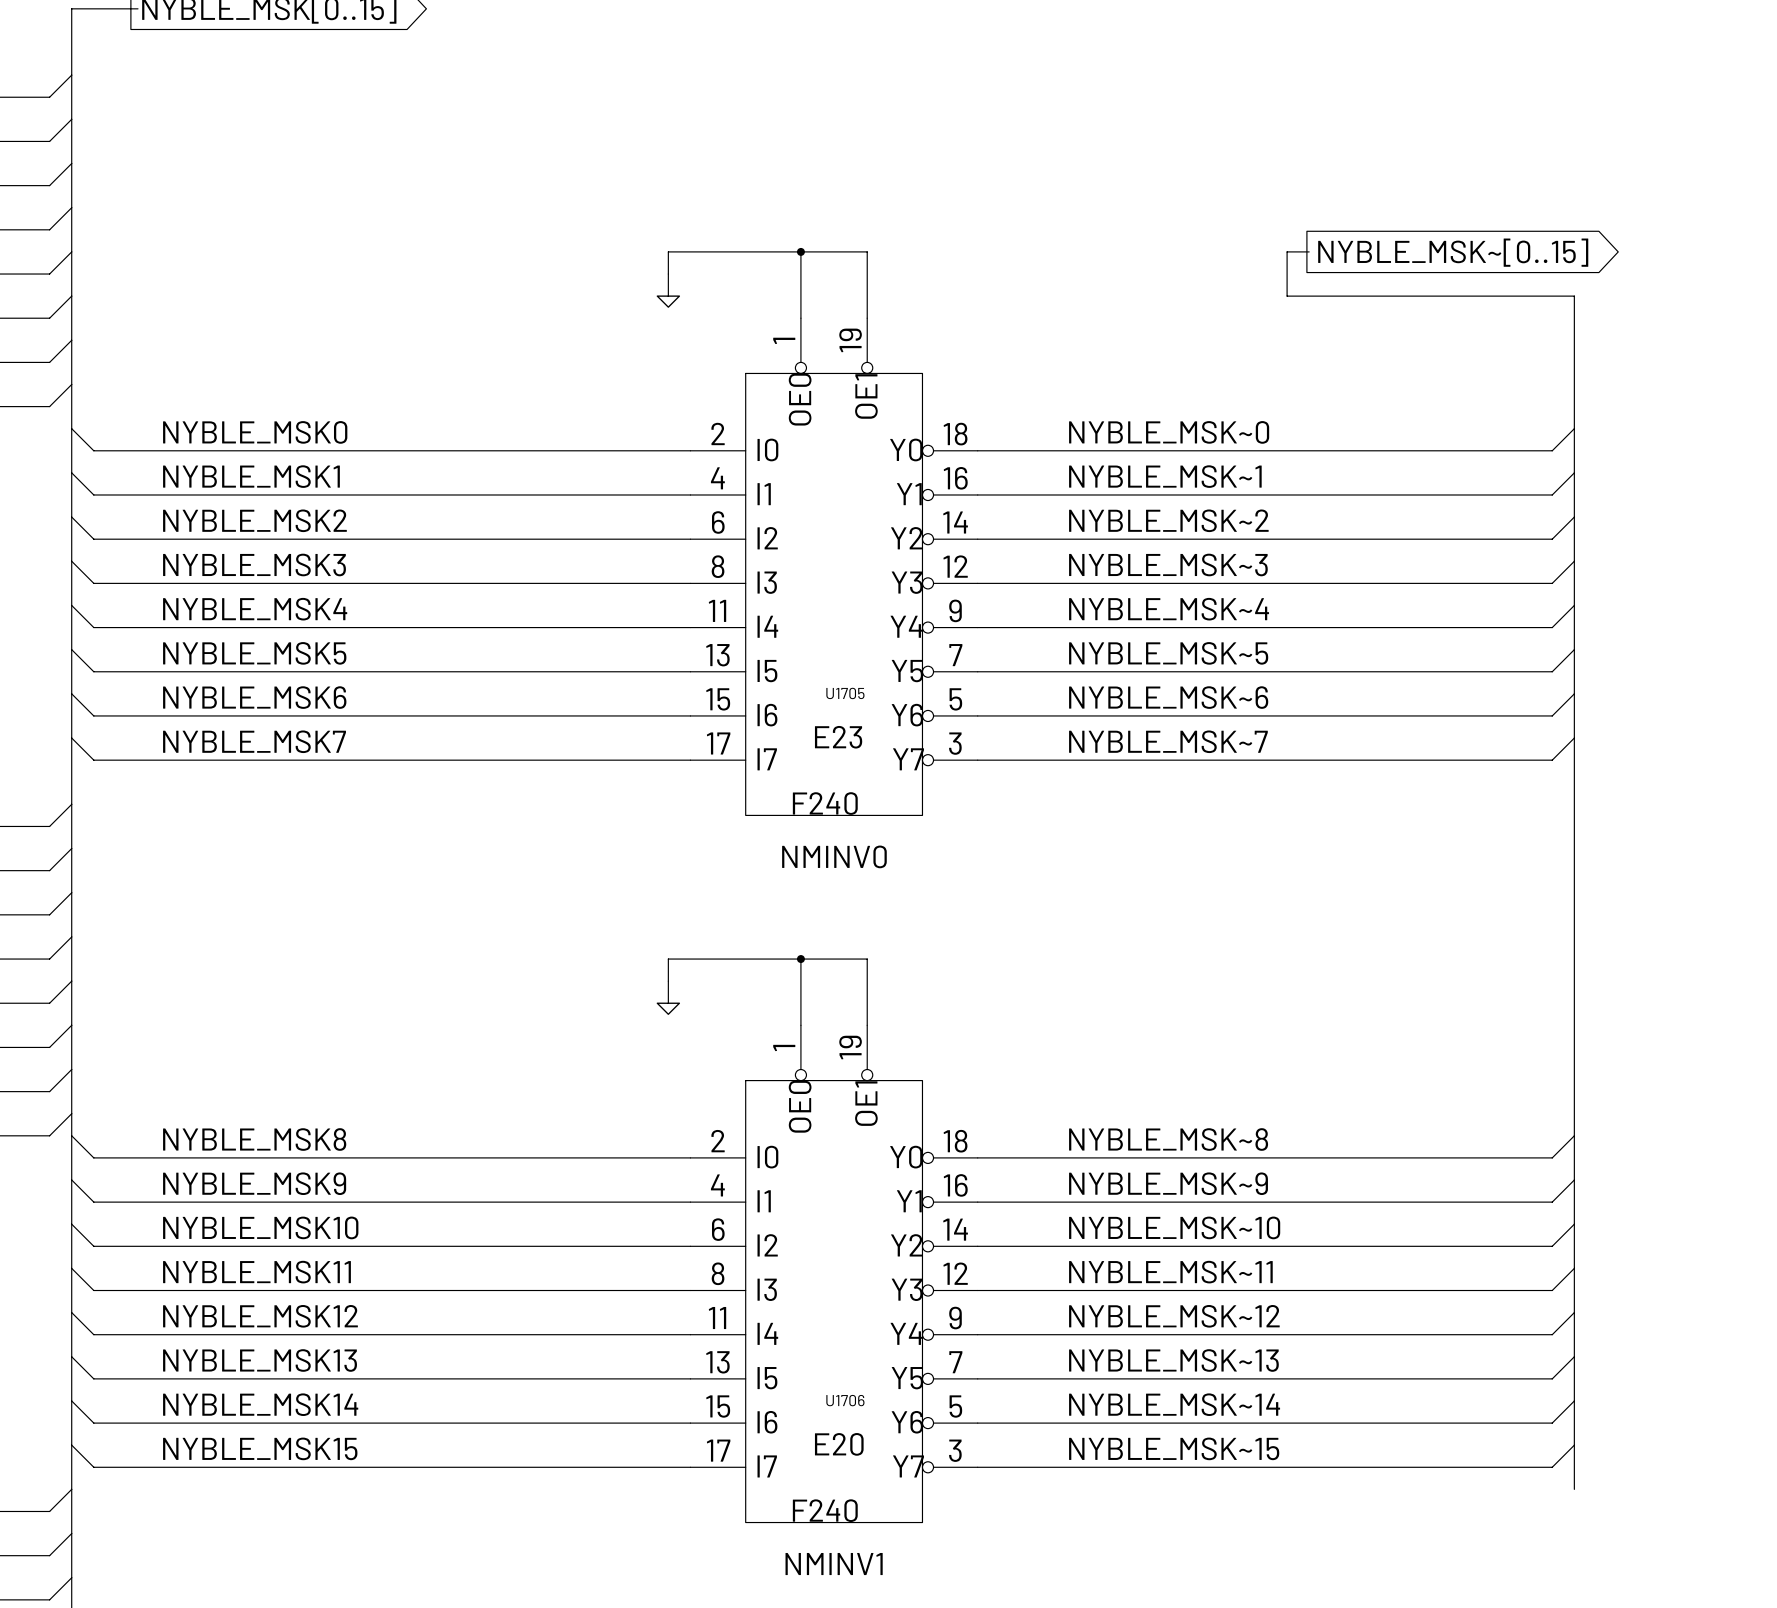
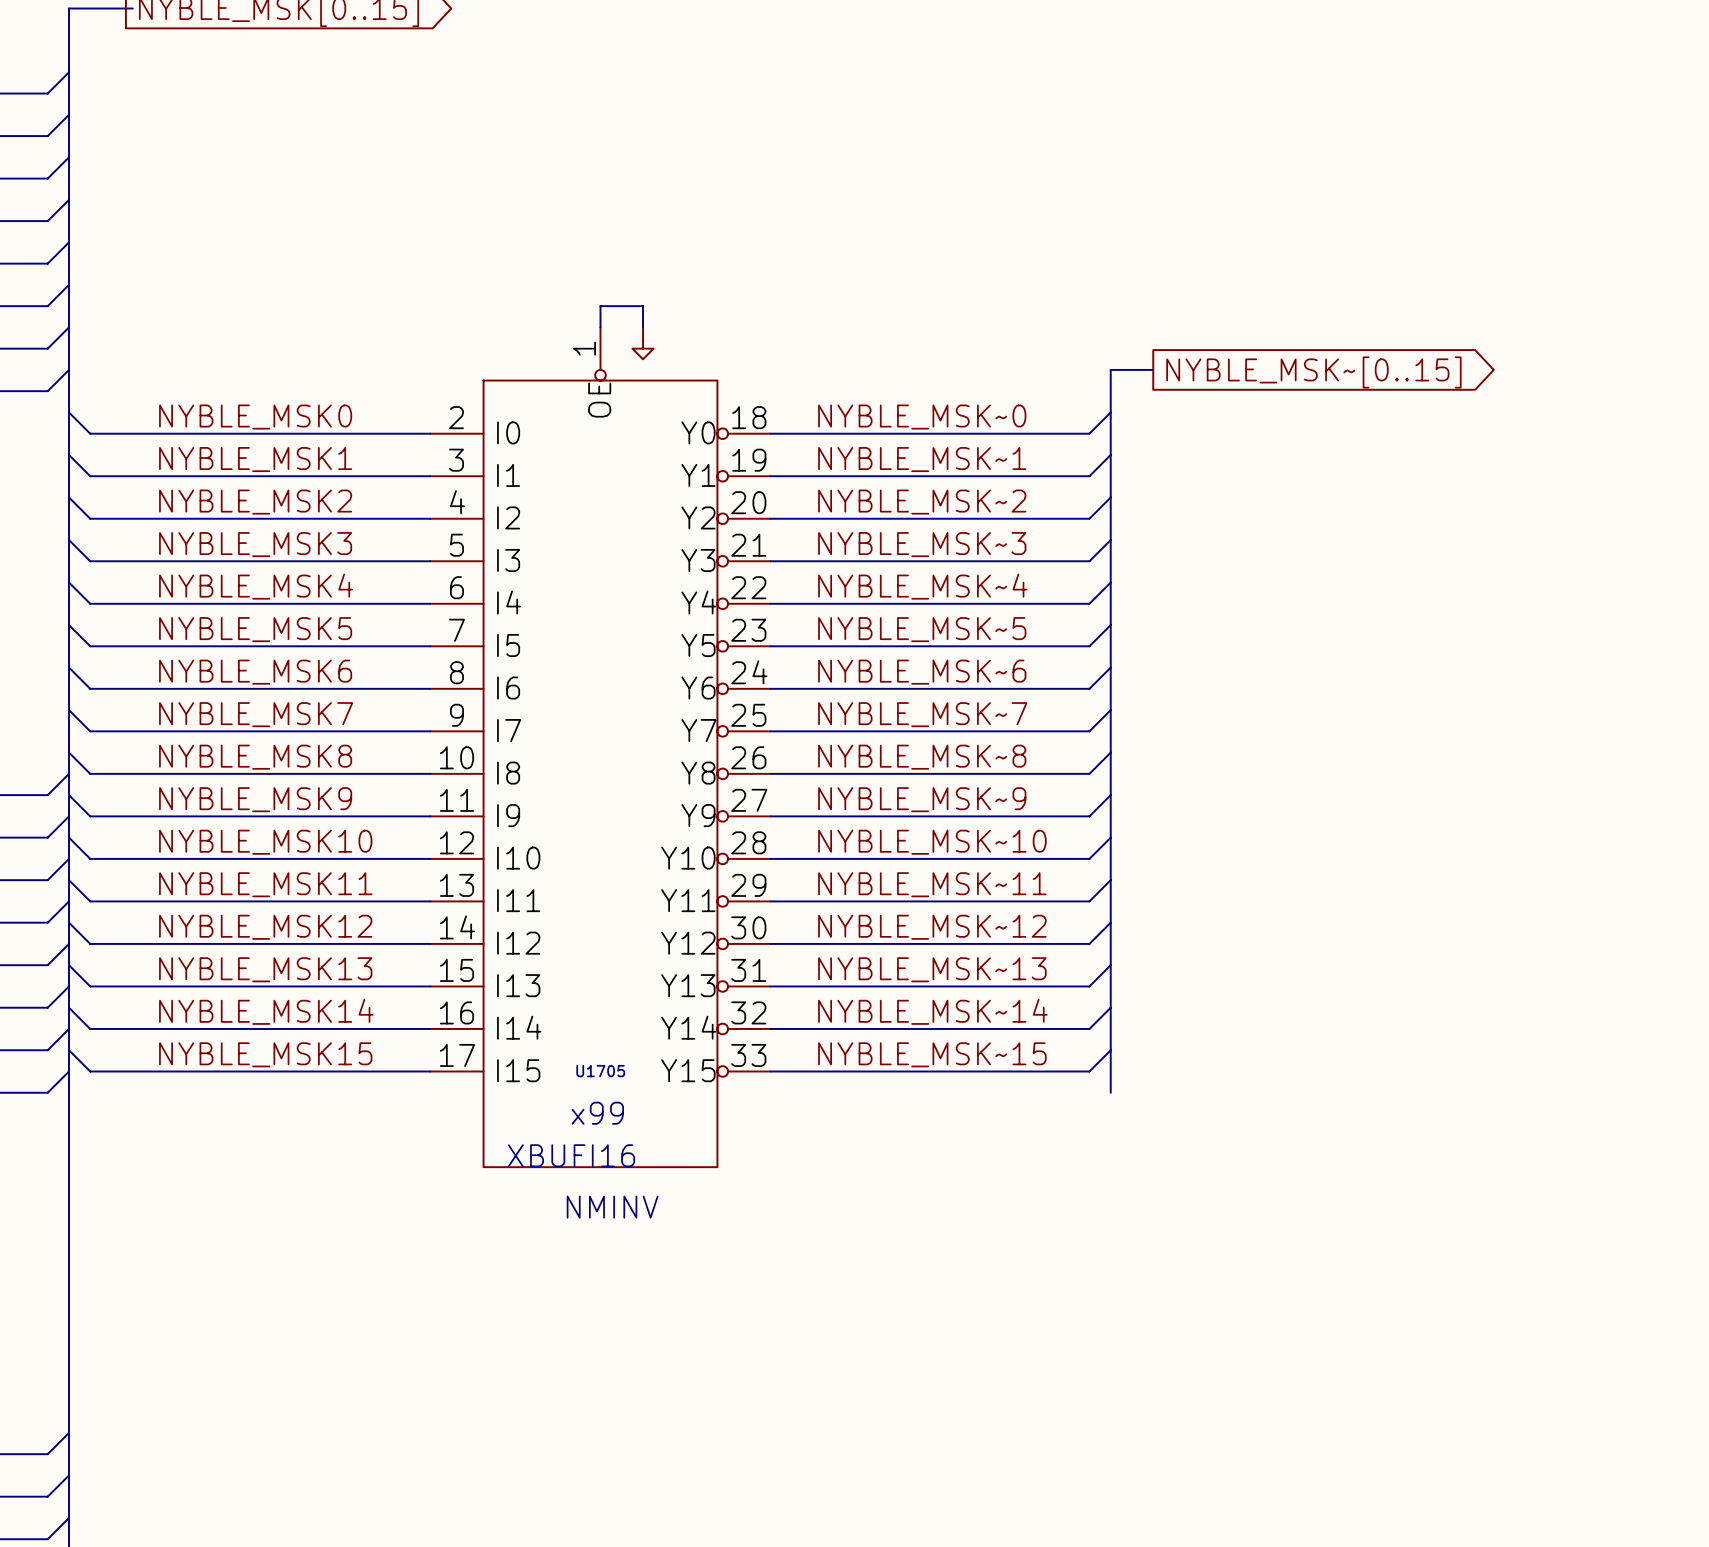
wire: (800, 251) (800, 318) -> none
junction: (800, 251) -> none
bus: (1309, 251) (1287, 251) (1287, 296) (1574, 296) (1574, 1489) -> none
global label position: NYBLE_MSK~[0..15] (1453, 252) -> NYBLE_MSK~[0..15] (1313, 372)
wire: (668, 274) (668, 251) (867, 251) (867, 318) -> none
power symbol position: (668, 290) -> (643, 343)
U1705 symbol: [690, 318, 978, 816] -> [430, 327, 771, 1168]
wire: none -> (600, 327) (600, 306) (643, 306) (643, 327)
bus: none -> (1153, 369) (1110, 369) (1110, 1092)
wire: (1574, 428) (1552, 450) (1132, 450) -> (1110, 412) (1089, 433)
label: none -> NYBLE_MSK~0 (922, 417)
label: NYBLE_MSK~0 (1169, 432) -> none
wire: (447, 450) (690, 450) -> none
wire: none -> (770, 433) (940, 433)
wire: (1574, 472) (1552, 494) (1132, 494) -> (1110, 454) (1089, 476)
label: none -> NYBLE_MSK~1 (922, 459)
label: NYBLE_MSK~1 (1165, 476) -> none
wire: (447, 494) (690, 494) -> none
wire: none -> (770, 476) (940, 476)
wire: (1574, 517) (1552, 539) (1132, 539) -> (1110, 497) (1089, 518)
label: none -> NYBLE_MSK~2 (922, 502)
label: NYBLE_MSK~2 (1168, 520) -> none
wire: (447, 539) (690, 539) -> none
wire: none -> (770, 518) (940, 518)
wire: (1574, 561) (1552, 583) (1132, 583) -> (1110, 540) (1089, 561)
label: none -> NYBLE_MSK~3 (922, 544)
label: NYBLE_MSK~3 (1168, 564) -> none
wire: (447, 583) (690, 583) -> none
wire: none -> (770, 561) (940, 561)
wire: (1574, 605) (1552, 627) (1132, 627) -> (1110, 582) (1089, 603)
label: none -> NYBLE_MSK~4 (922, 586)
label: NYBLE_MSK~4 (1169, 609) -> none
wire: (447, 627) (690, 627) -> none
wire: none -> (770, 603) (940, 603)
wire: (1574, 649) (1552, 671) (1132, 671) -> (1110, 625) (1089, 646)
label: none -> NYBLE_MSK~5 (922, 629)
label: NYBLE_MSK~5 (1168, 653) -> none
wire: (447, 671) (690, 671) -> none
wire: none -> (770, 646) (940, 646)
U1705 name position: U1705 (845, 693) -> U1705 (600, 1071)
wire: (1574, 693) (1552, 715) (1132, 715) -> (1110, 667) (1089, 688)
label: none -> NYBLE_MSK~6 (922, 672)
label: NYBLE_MSK~6 (1168, 697) -> none
wire: (447, 715) (690, 715) -> none
wire: none -> (770, 688) (940, 688)
U1705 text: E23 (838, 737) -> x99 (597, 1113)
wire: (1574, 738) (1552, 760) (1132, 760) -> (1110, 710) (1089, 731)
label: none -> NYBLE_MSK~7 (922, 714)
label: NYBLE_MSK~7 (1168, 741) -> none
wire: (447, 760) (690, 760) -> none
wire: none -> (770, 731) (940, 731)
wire: none -> (69, 752) (90, 773) (430, 773)
wire: none -> (1110, 752) (1089, 773) (770, 773)
label: none -> NYBLE_MSK8 (255, 757)
label: none -> NYBLE_MSK~8 (922, 757)
U1705 value: F240 (825, 803) -> XBUFI16 (571, 1155)
wire: none -> (69, 795) (90, 816) (430, 816)
wire: none -> (1110, 795) (1089, 816) (770, 816)
label: none -> NYBLE_MSK9 (255, 799)
label: none -> NYBLE_MSK~9 (922, 799)
U1705 text: NMINV0 (834, 856) -> NMINV (612, 1207)
wire: none -> (69, 837) (90, 858) (430, 858)
wire: none -> (1110, 837) (1089, 858) (770, 858)
label: none -> NYBLE_MSK10 (265, 842)
label: none -> NYBLE_MSK~10 (932, 842)
wire: none -> (69, 880) (90, 901) (430, 901)
wire: none -> (1110, 880) (1089, 901) (770, 901)
label: none -> NYBLE_MSK11 (265, 884)
label: none -> NYBLE_MSK~11 (932, 884)
wire: none -> (69, 922) (90, 943) (430, 943)
wire: (800, 959) (800, 1025) -> (1110, 965) (1089, 986) (770, 986)
junction: (800, 959) -> none
wire: none -> (1110, 922) (1089, 943) (770, 943)
label: none -> NYBLE_MSK12 (265, 927)
label: none -> NYBLE_MSK~12 (932, 927)
wire: (668, 981) (668, 959) (867, 959) (867, 1025) -> none
power symbol: (668, 998) -> none
wire: none -> (69, 965) (90, 986) (430, 986)
label: none -> NYBLE_MSK13 (265, 969)
label: none -> NYBLE_MSK~13 (932, 969)
wire: none -> (69, 1007) (90, 1028) (430, 1028)
wire: none -> (1110, 1007) (1089, 1028) (770, 1028)
label: none -> NYBLE_MSK14 (266, 1011)
label: none -> NYBLE_MSK~14 (932, 1011)
wire: none -> (69, 1050) (90, 1071) (430, 1071)
wire: none -> (1110, 1050) (1089, 1071) (770, 1071)
label: none -> NYBLE_MSK~15 (932, 1054)
wire: (71, 1135) (93, 1157) (690, 1157) -> none
wire: (1574, 1135) (1552, 1157) (977, 1157) -> none
label: NYBLE_MSK8 (254, 1139) -> NYBLE_MSK15 (265, 1054)
label: NYBLE_MSK~8 (1168, 1139) -> none
wire: (71, 1180) (93, 1202) (690, 1202) -> none
wire: (1574, 1180) (1552, 1202) (977, 1202) -> none
label: NYBLE_MSK9 (254, 1183) -> none
label: NYBLE_MSK~9 (1168, 1183) -> none
wire: (71, 1224) (93, 1246) (690, 1246) -> none
wire: (1574, 1224) (1552, 1246) (977, 1246) -> none
label: NYBLE_MSK10 (260, 1227) -> none
label: NYBLE_MSK~10 (1174, 1227) -> none
wire: (71, 1268) (93, 1290) (690, 1290) -> none
wire: (1574, 1268) (1552, 1290) (977, 1290) -> none
label: NYBLE_MSK11 (256, 1272) -> none
label: NYBLE_MSK~11 (1170, 1272) -> none
U1706: F240 (834, 1273) -> none
wire: (71, 1312) (93, 1334) (690, 1334) -> none
wire: (1574, 1312) (1552, 1334) (977, 1334) -> none
label: NYBLE_MSK12 (260, 1316) -> none
label: NYBLE_MSK~12 (1174, 1316) -> none
wire: (71, 1356) (93, 1378) (690, 1378) -> none
wire: (1574, 1356) (1552, 1378) (977, 1378) -> none
label: NYBLE_MSK13 (260, 1360) -> none
label: NYBLE_MSK~13 (1173, 1360) -> none
wire: (71, 1400) (93, 1423) (690, 1423) -> none
wire: (1574, 1400) (1552, 1423) (977, 1423) -> none
label: NYBLE_MSK14 (260, 1404) -> none
label: NYBLE_MSK~14 (1174, 1404) -> none
wire: (71, 1445) (93, 1467) (690, 1467) -> none
wire: (1574, 1445) (1552, 1467) (977, 1467) -> none
label: NYBLE_MSK15 (260, 1448) -> none
label: NYBLE_MSK~15 (1174, 1448) -> none

